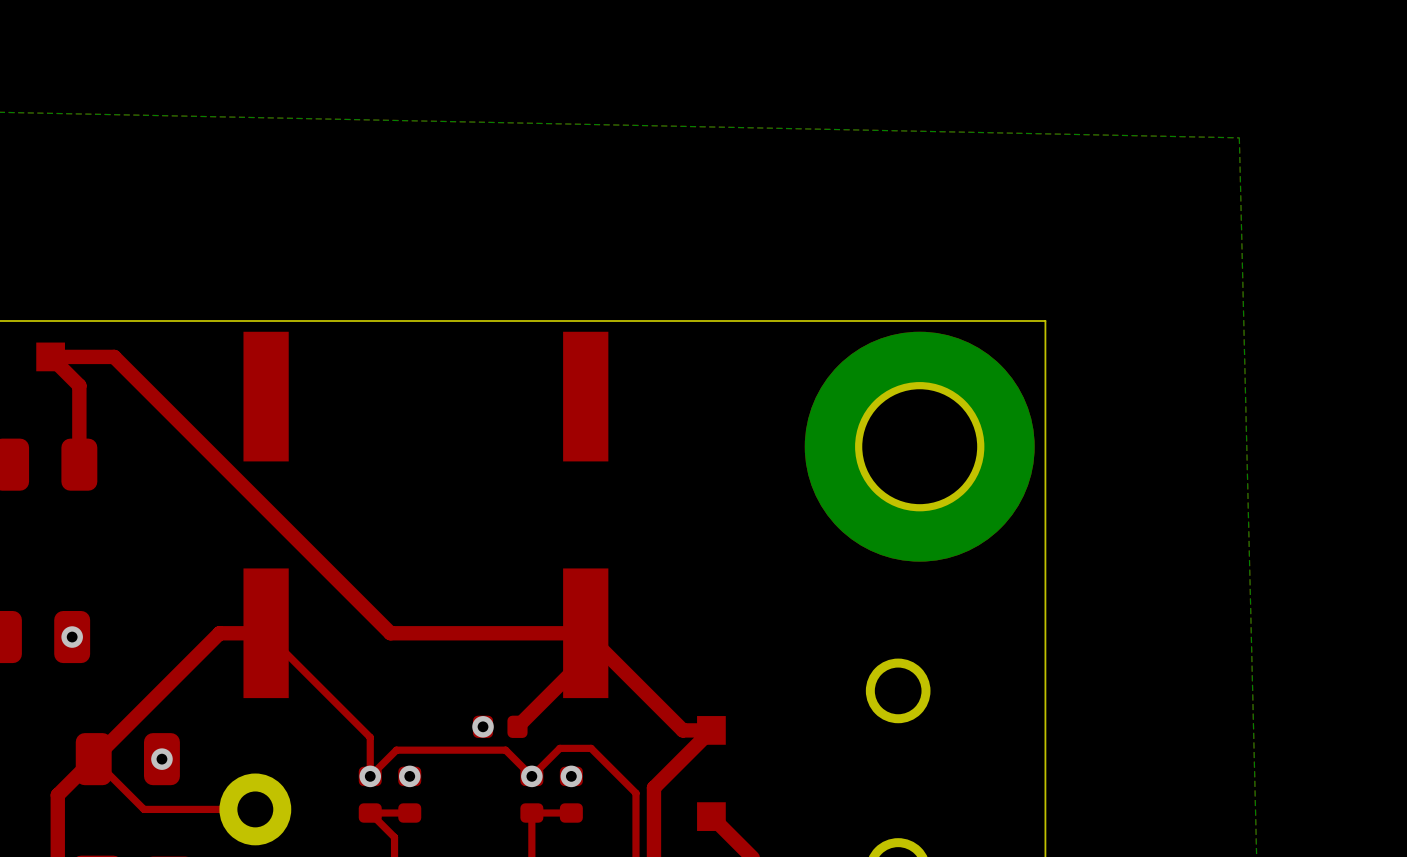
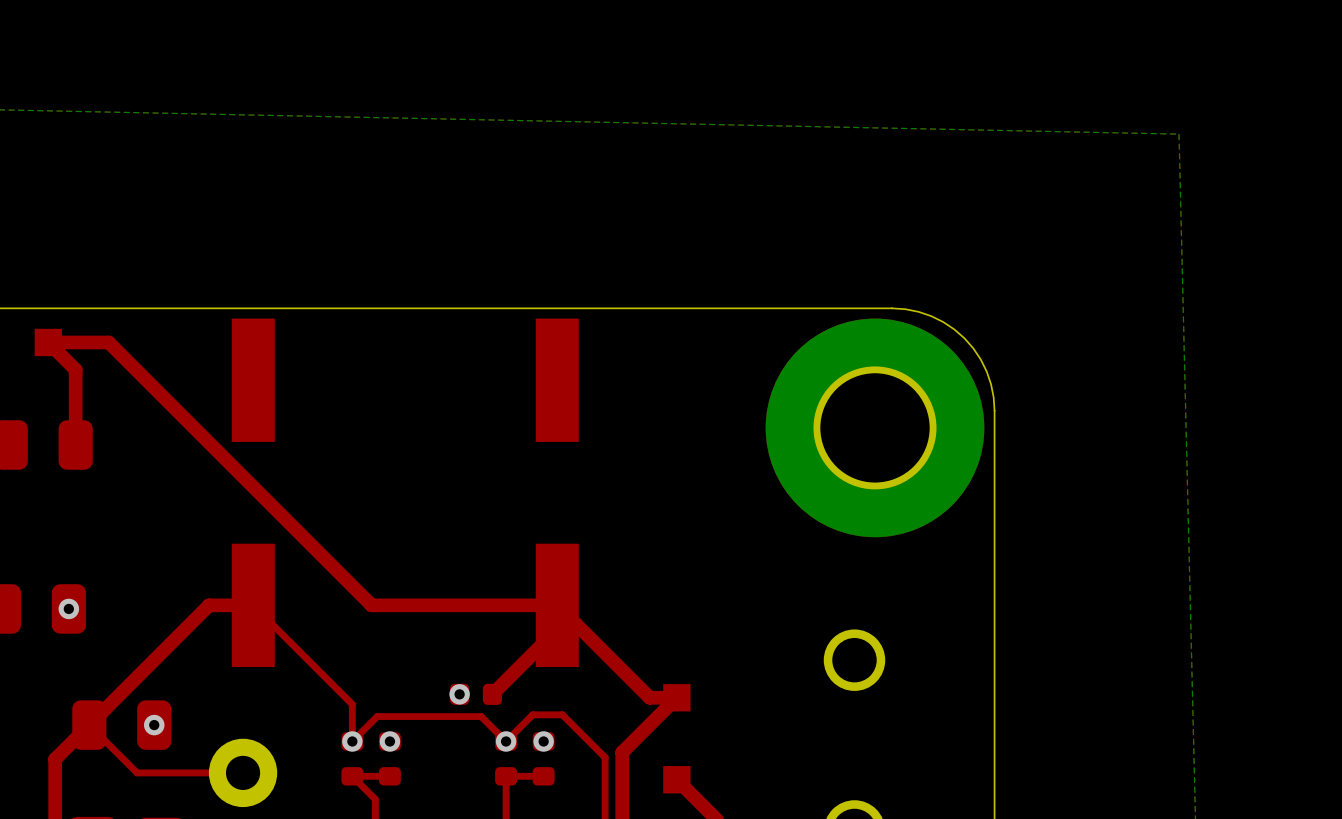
board edge: (937, 321) (1045, 321) (1045, 428) -> (892, 308) (905, 309) (931, 316) (943, 322) (964, 338) (973, 348) (986, 371) (991, 384) (994, 410)

